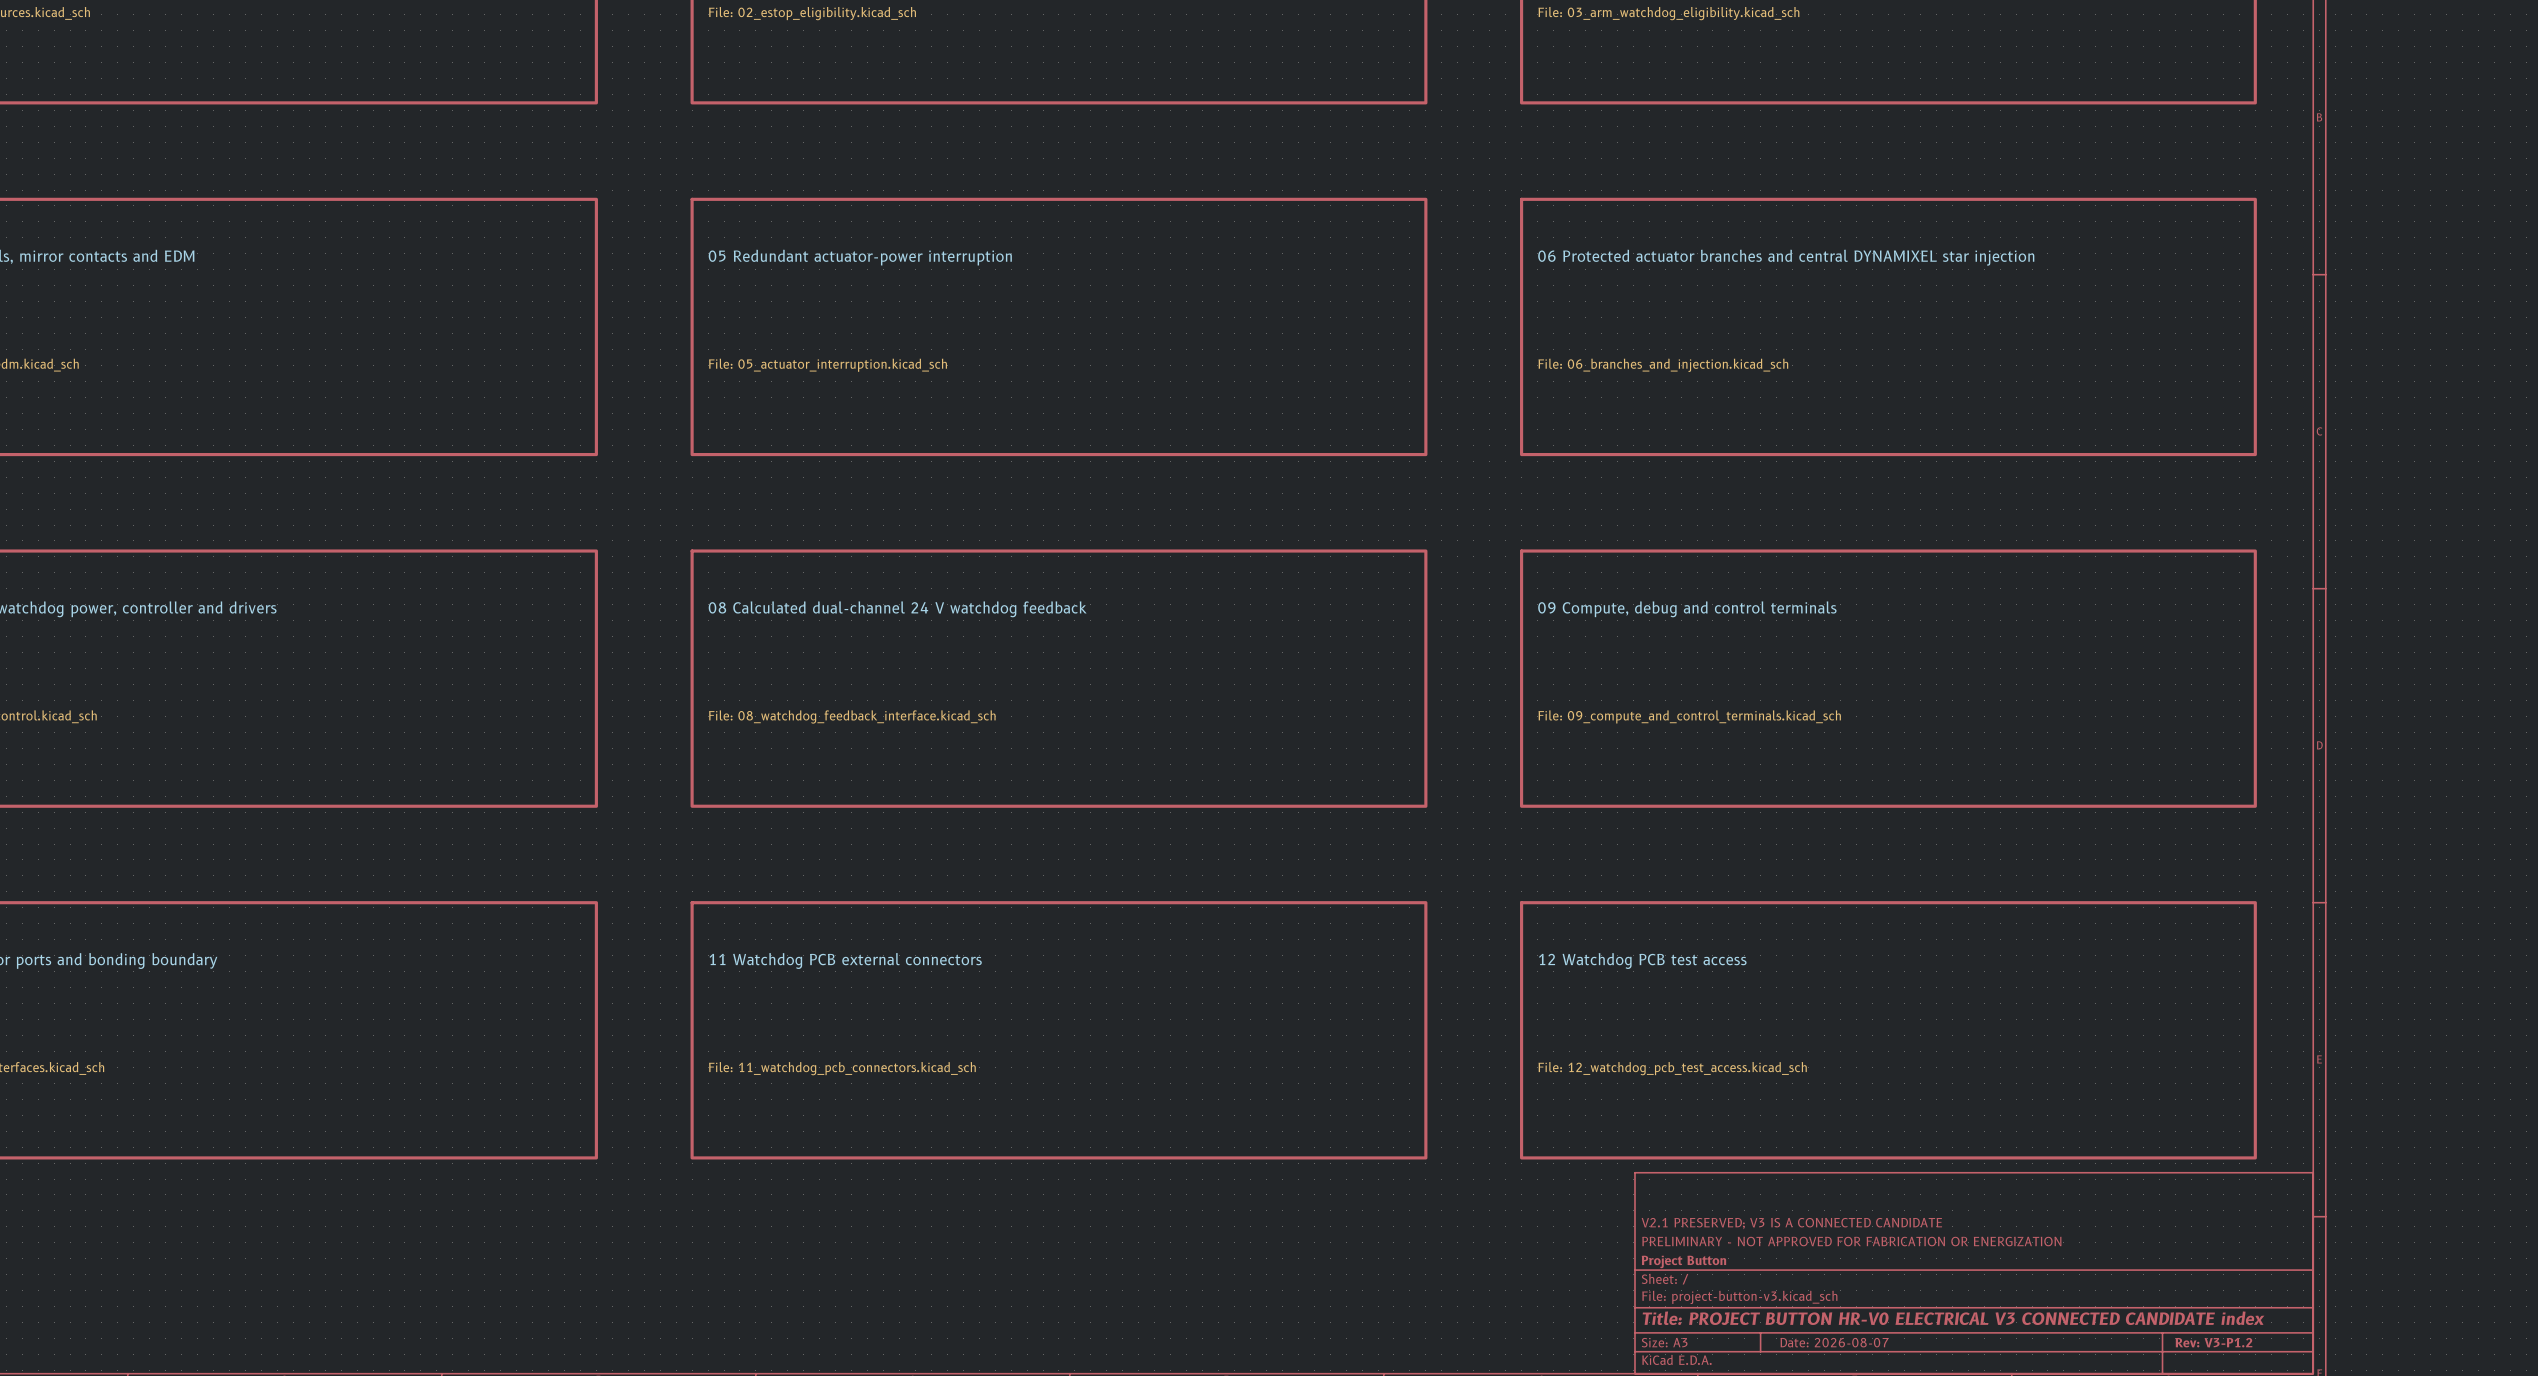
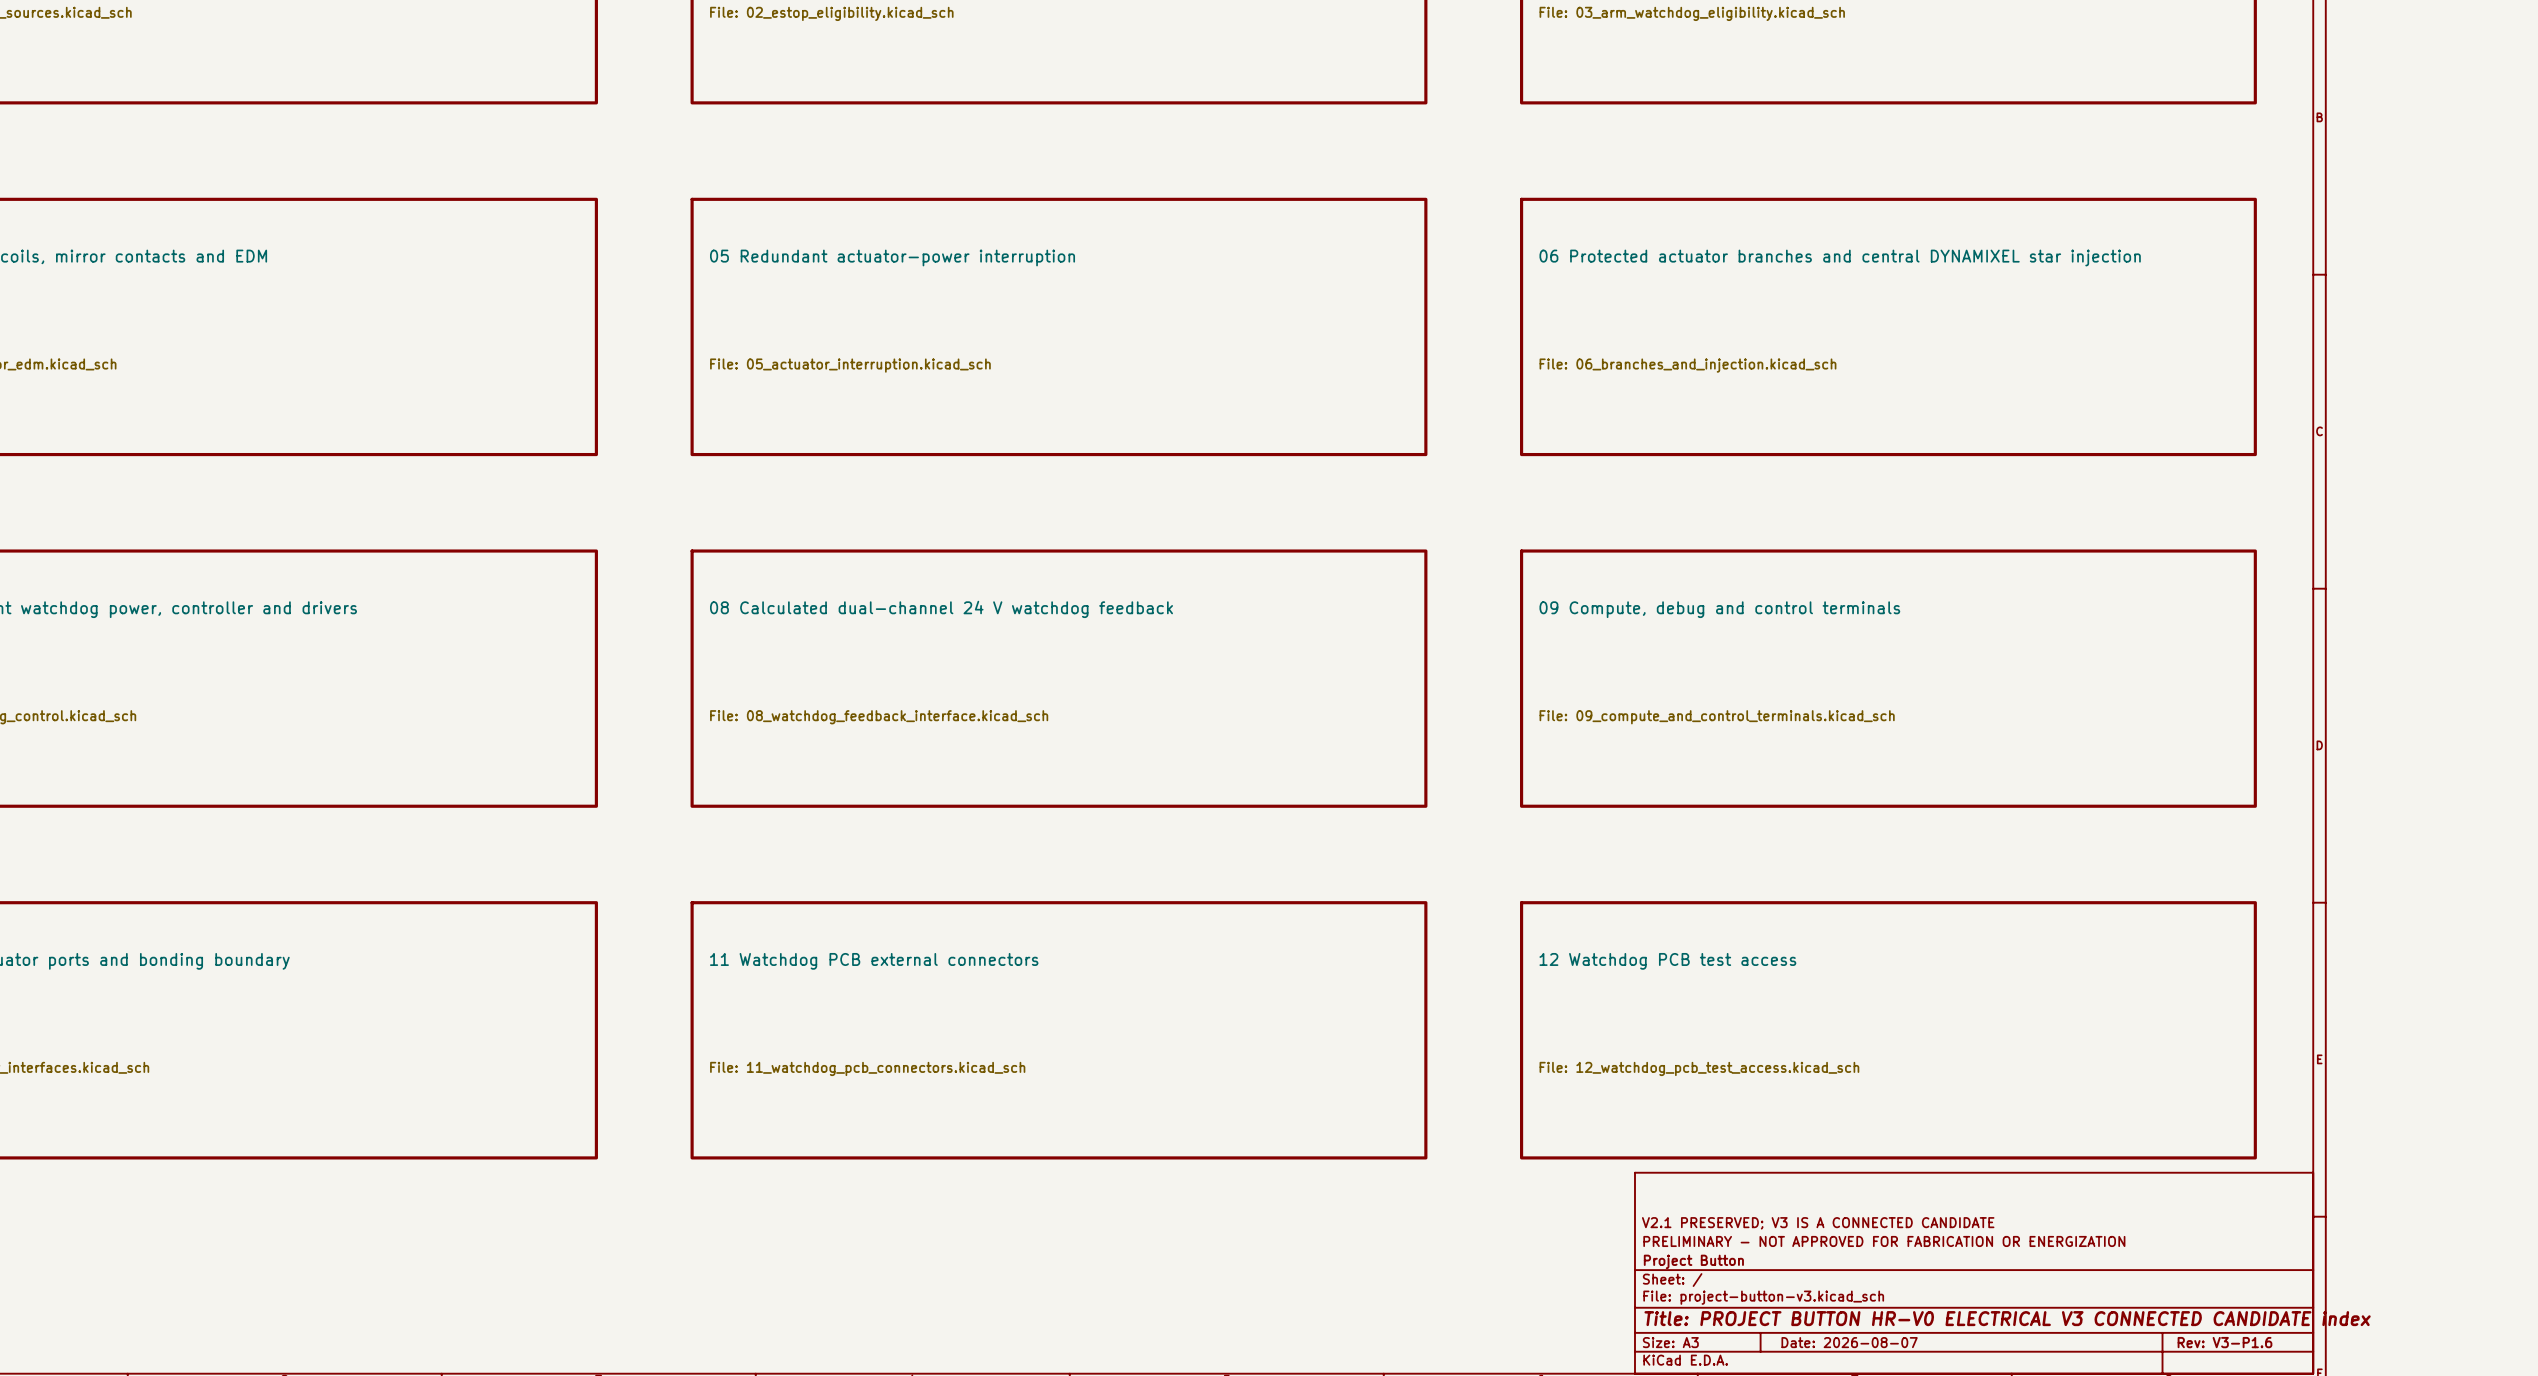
title block: Rev: V3-P1.2 (2213, 1342) -> Rev: V3-P1.6 (2224, 1342)

